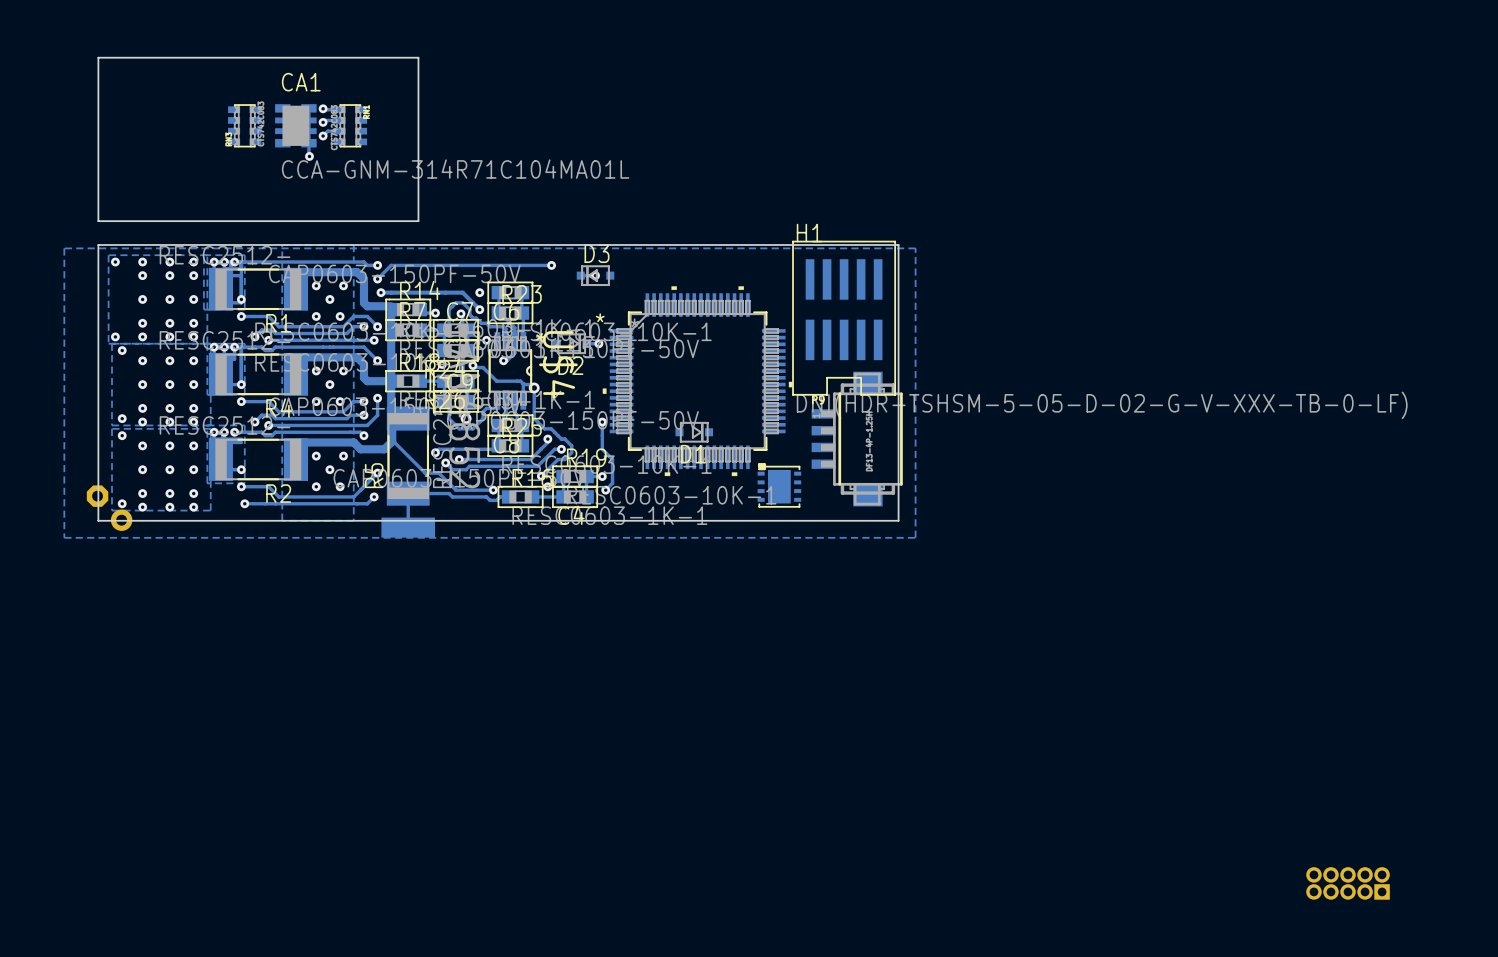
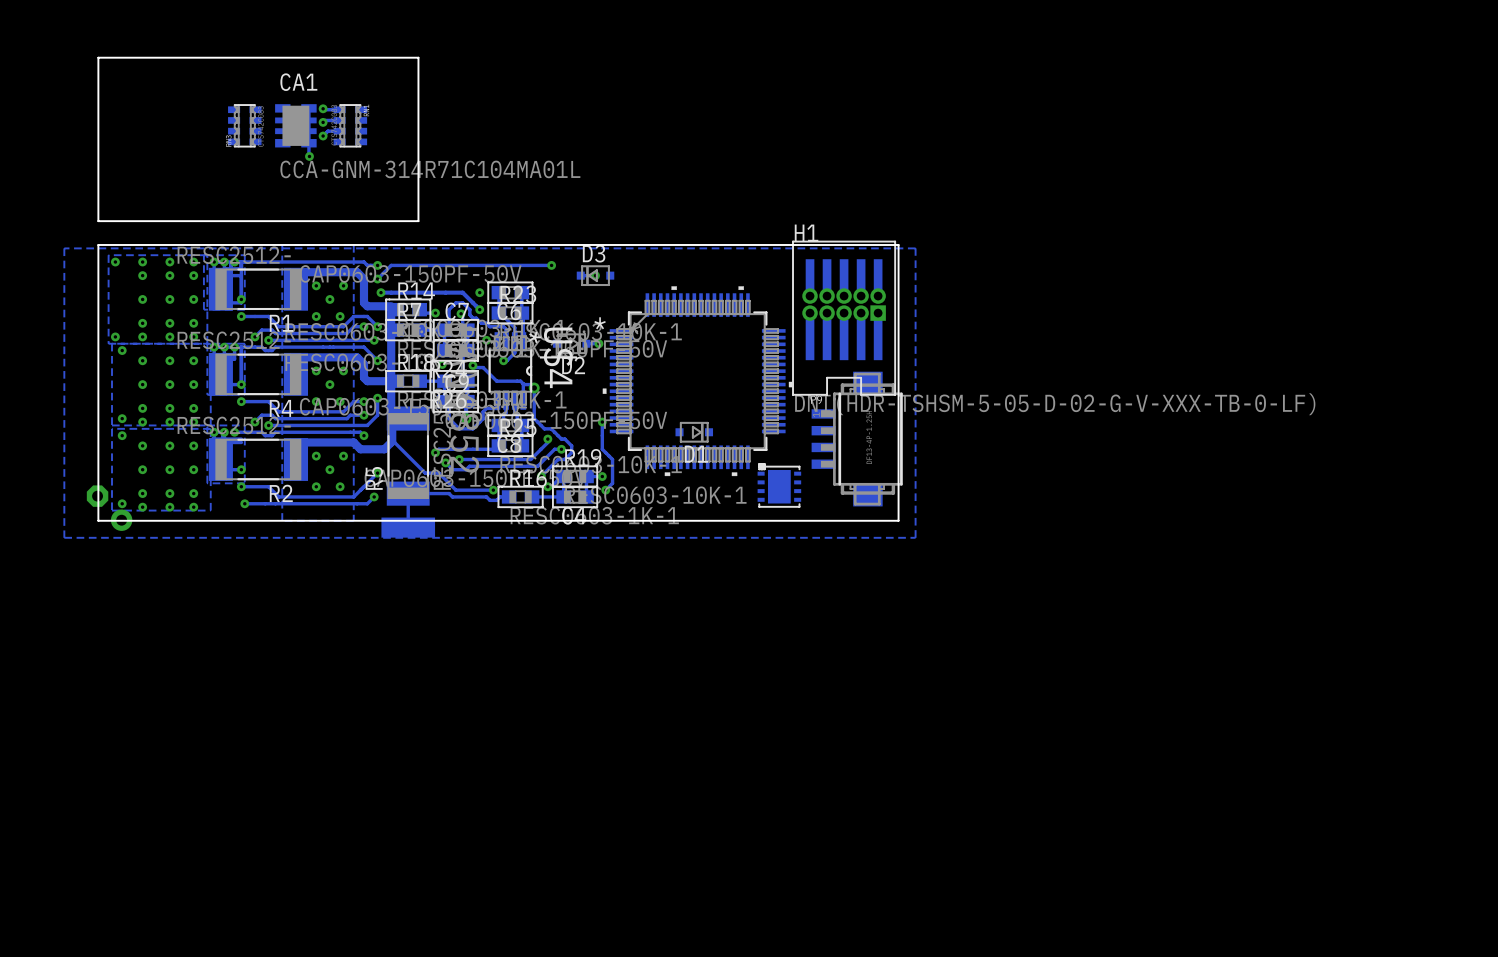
part: none -> (844, 304)
part: (1348, 883) -> none

